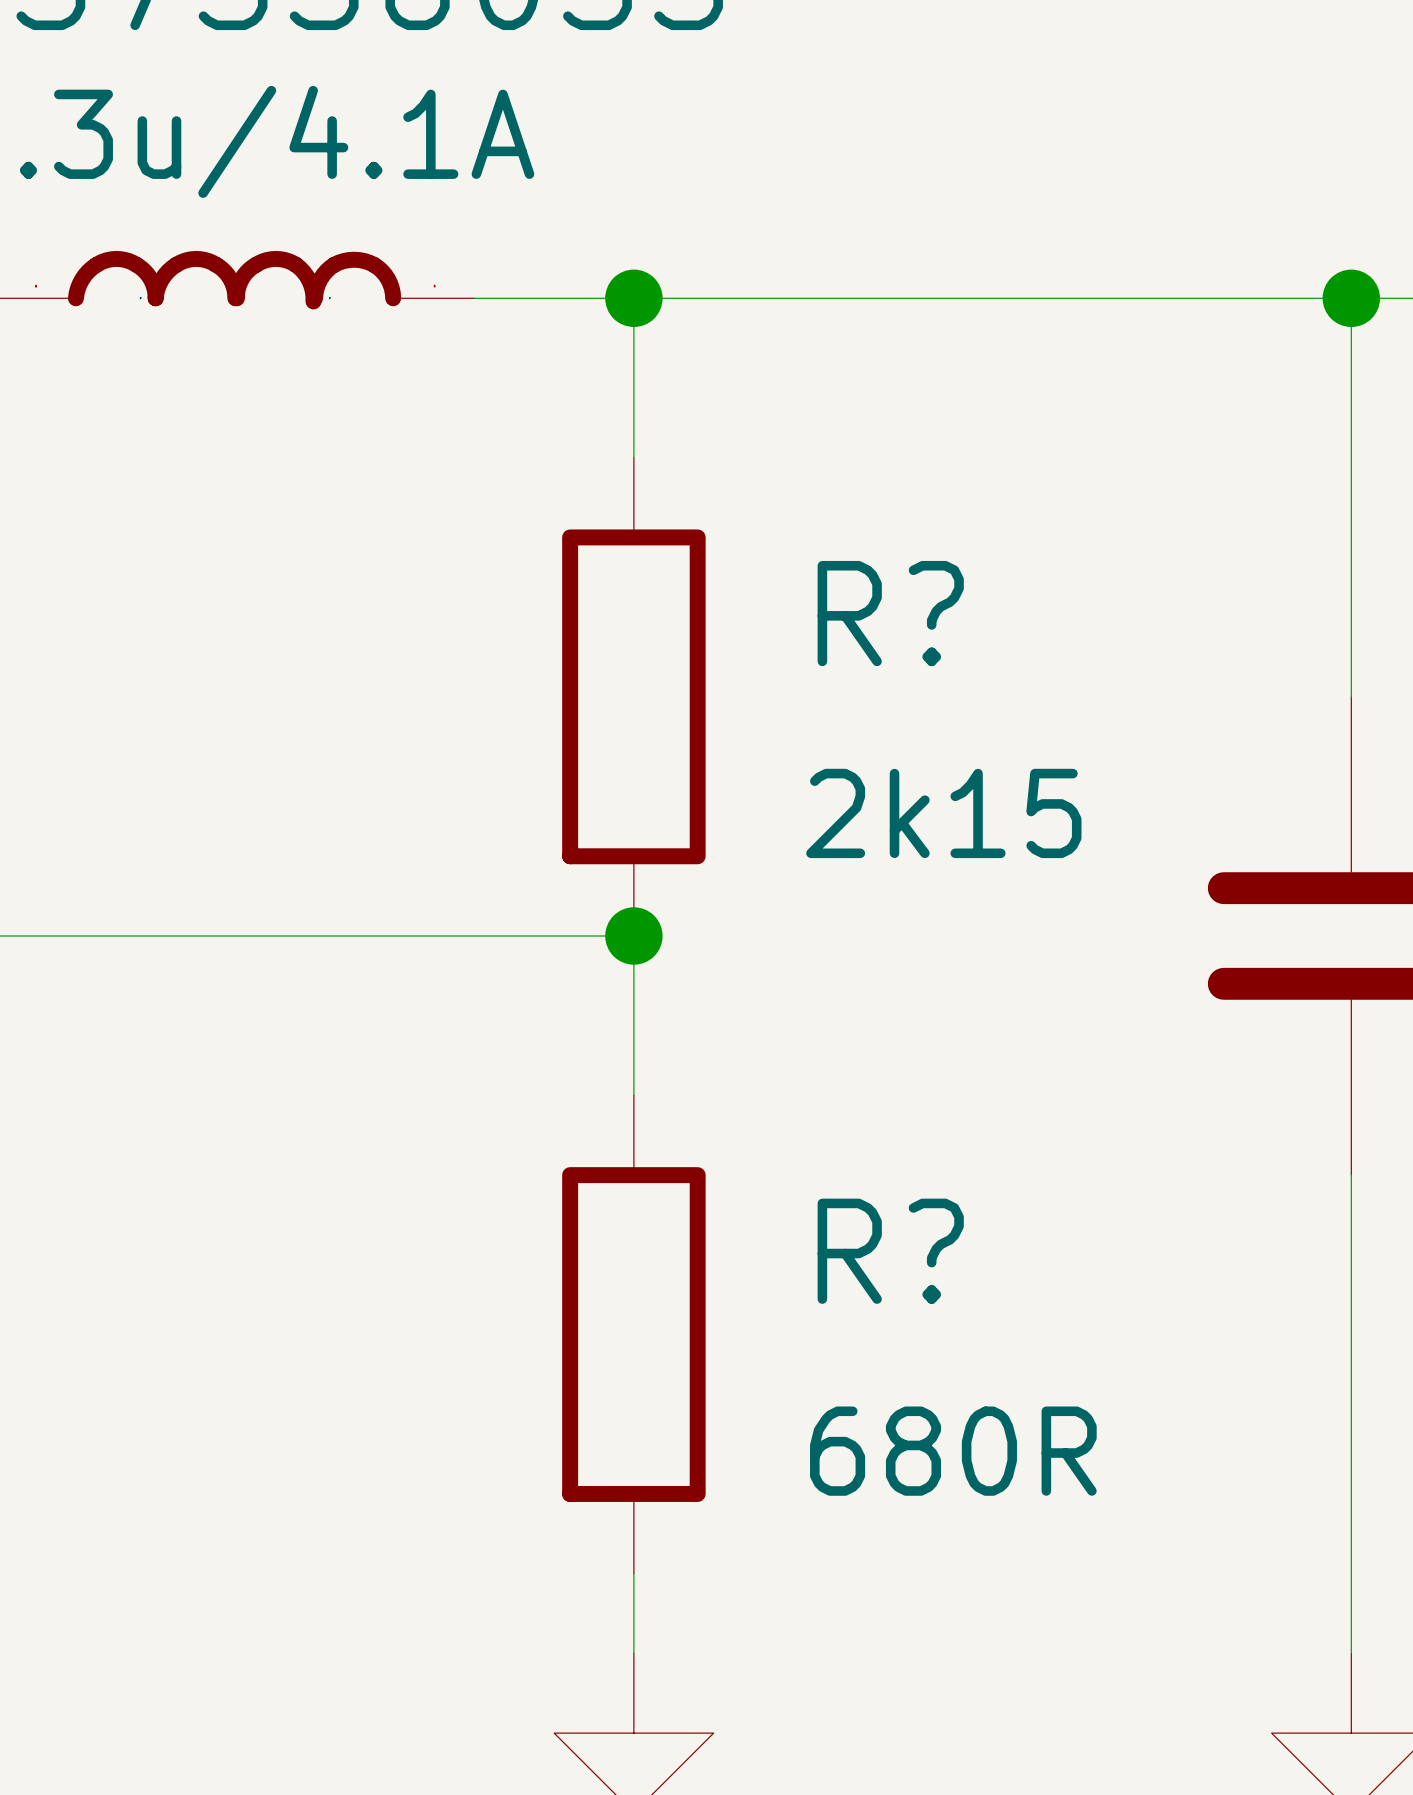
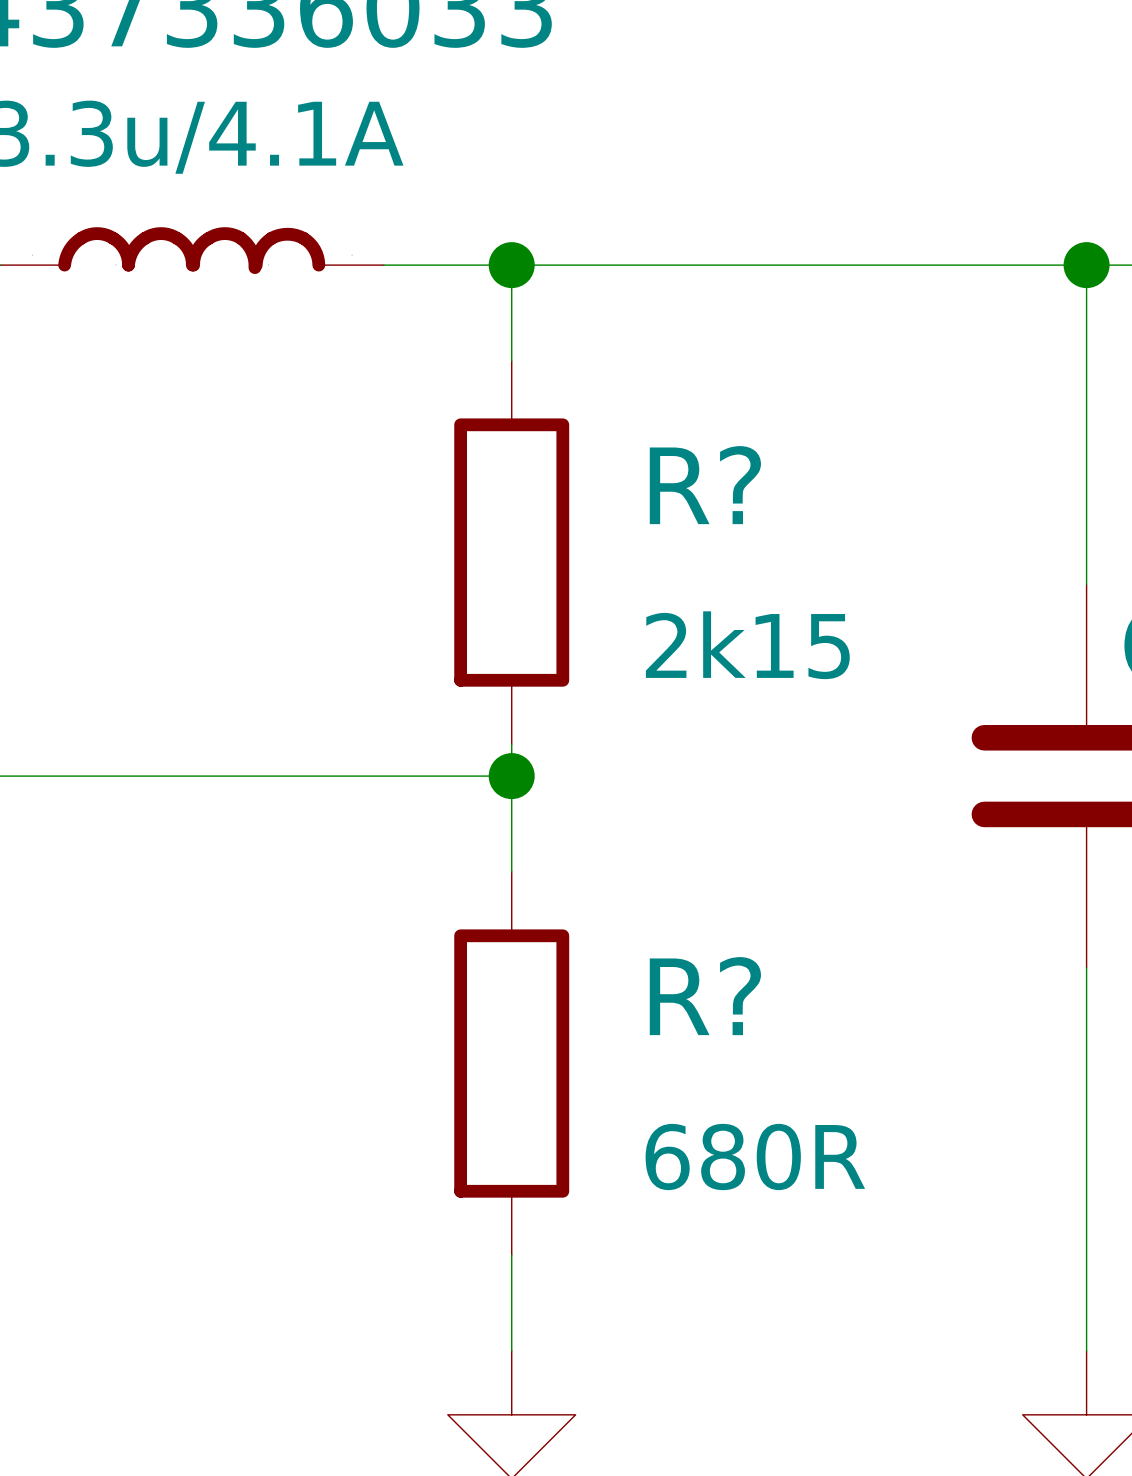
R? position: (633, 696) -> (511, 552)
R? position: (633, 1334) -> (511, 1063)

